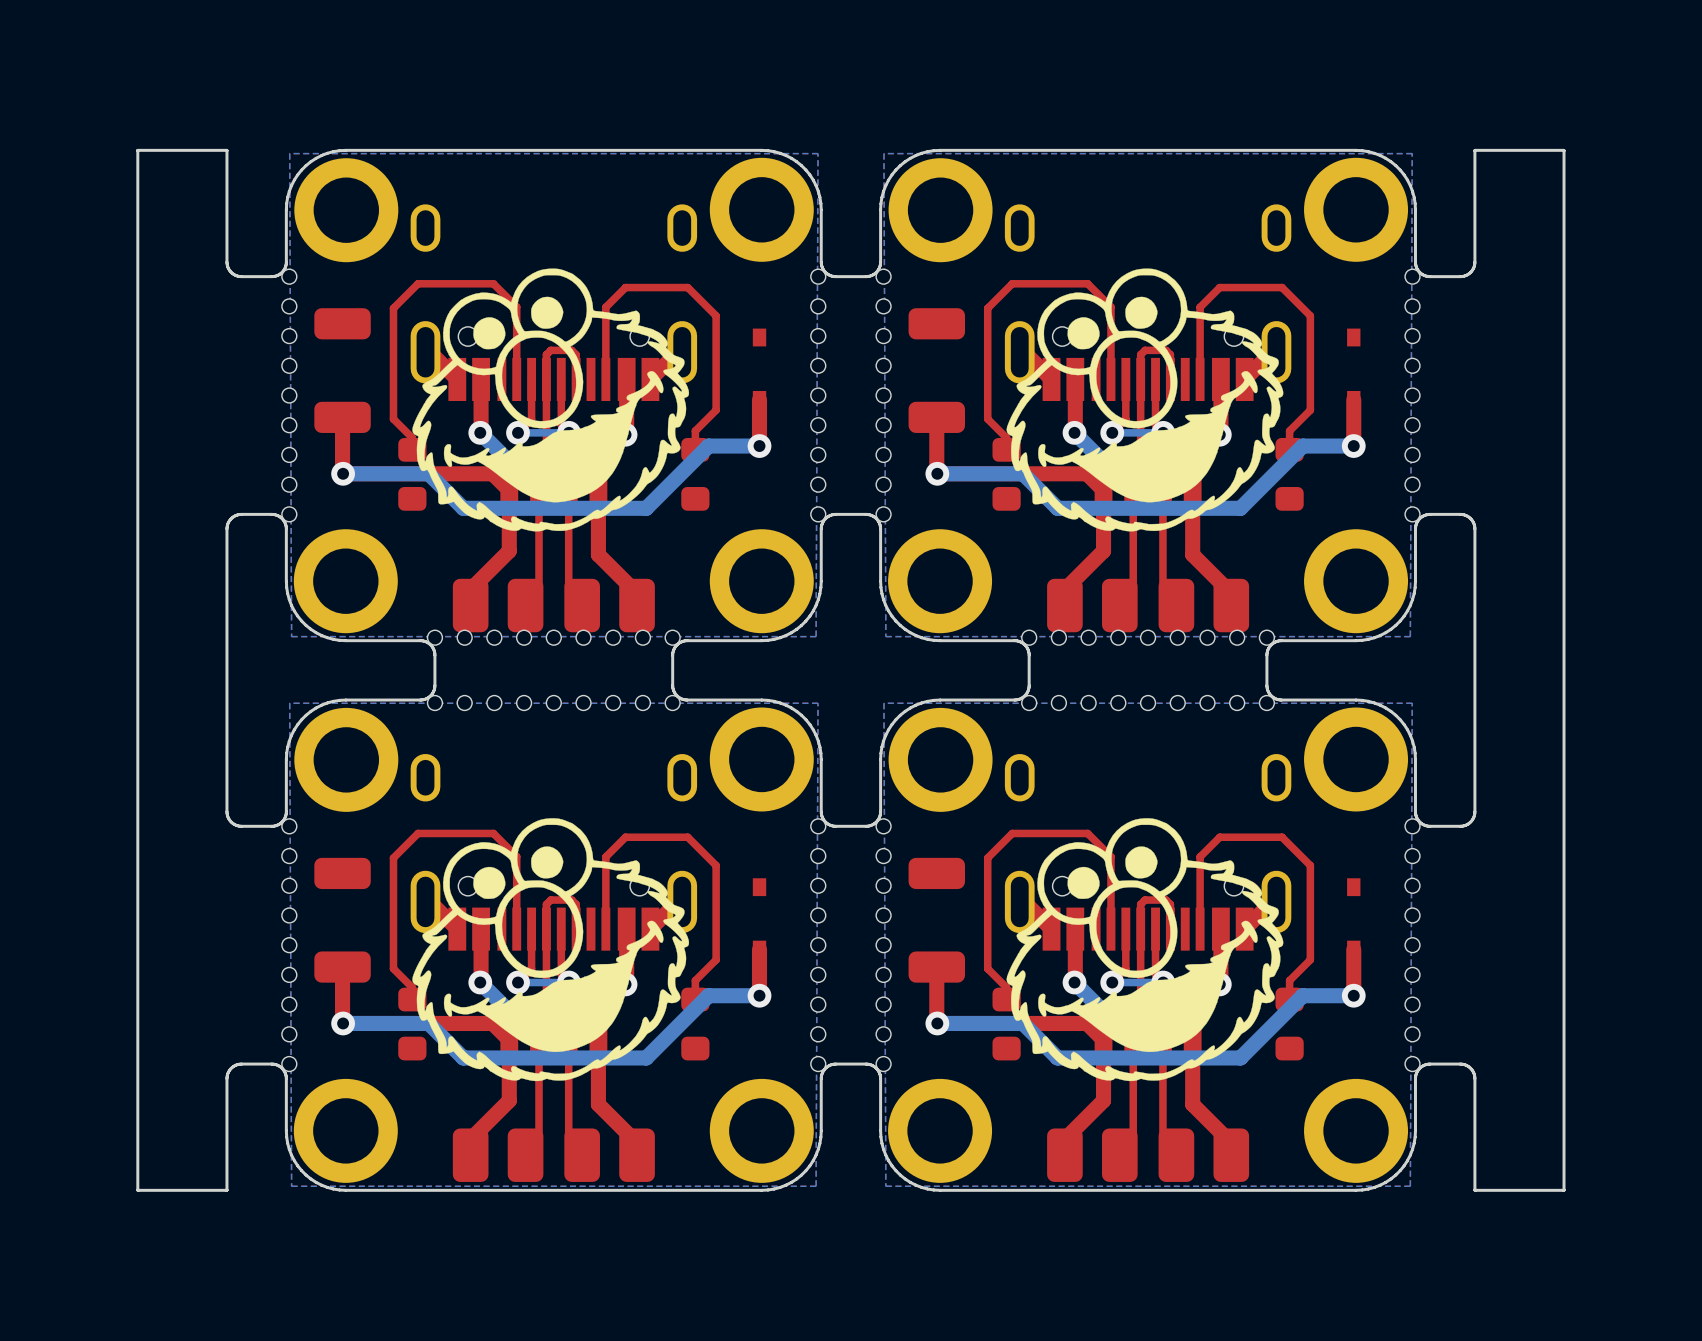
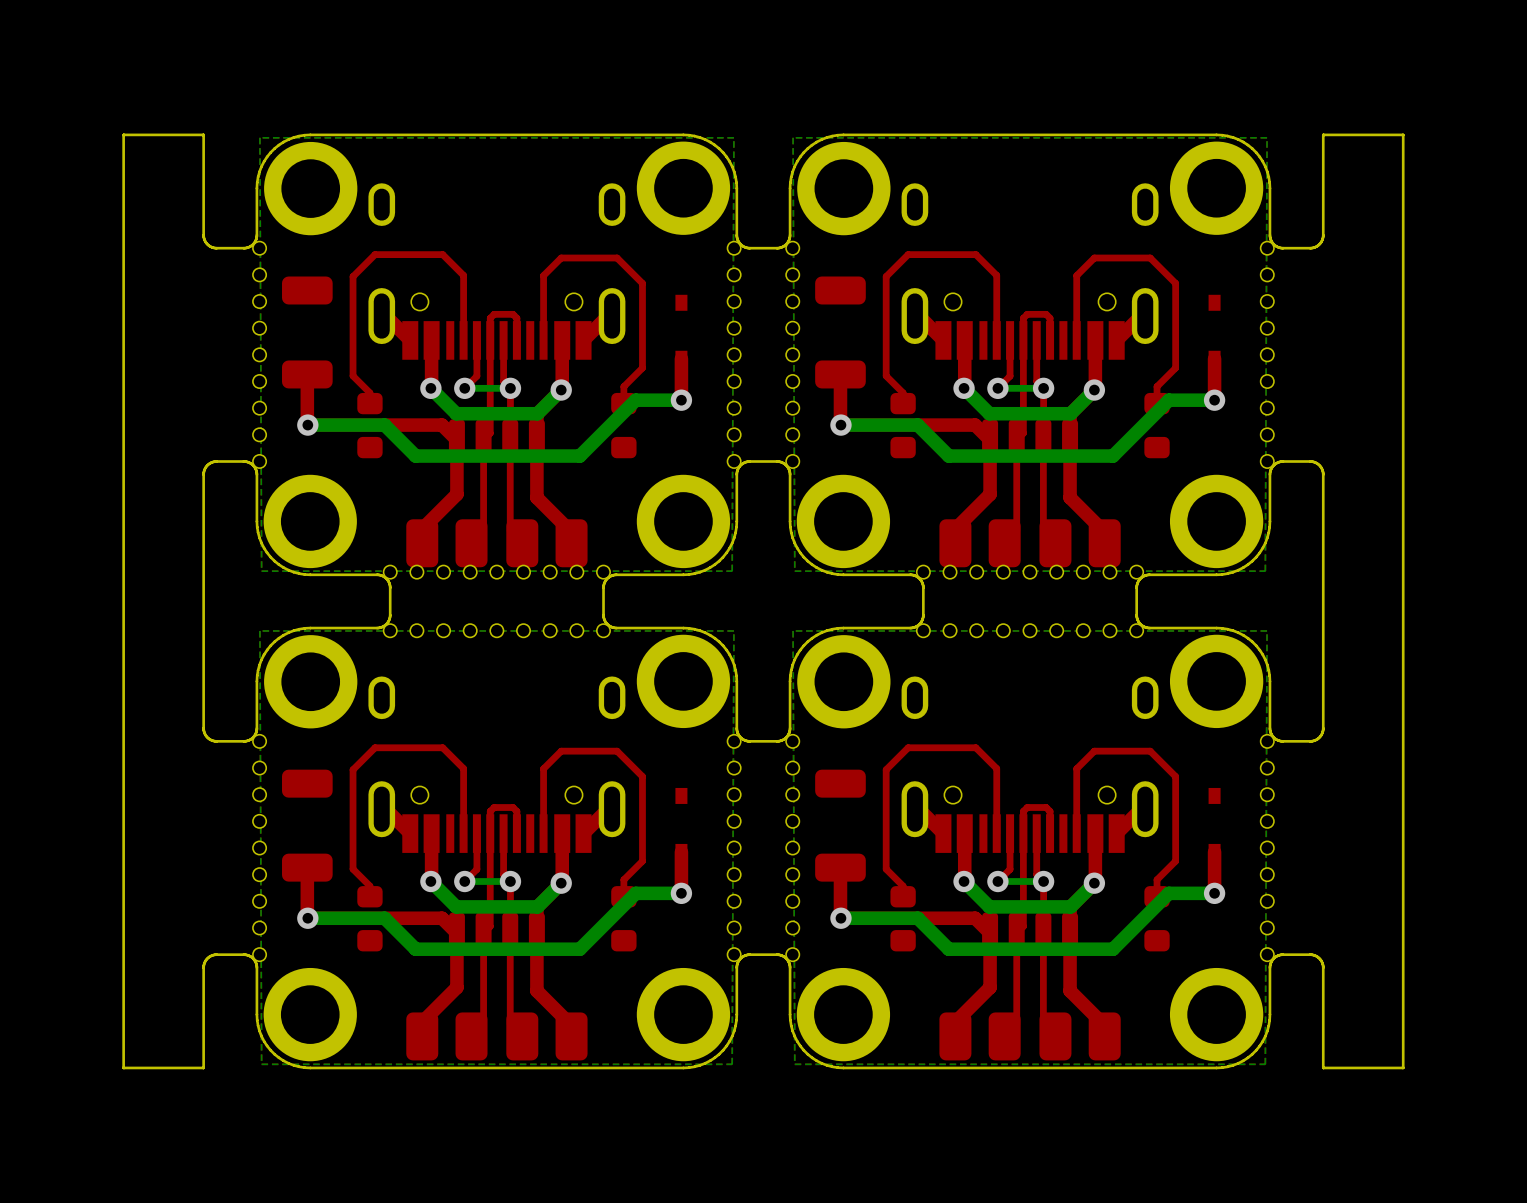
drawing: [412, 268, 690, 532] -> none
drawing: [1006, 268, 1284, 532] -> none
drawing: [412, 818, 690, 1082] -> none
drawing: [1006, 818, 1284, 1082] -> none

